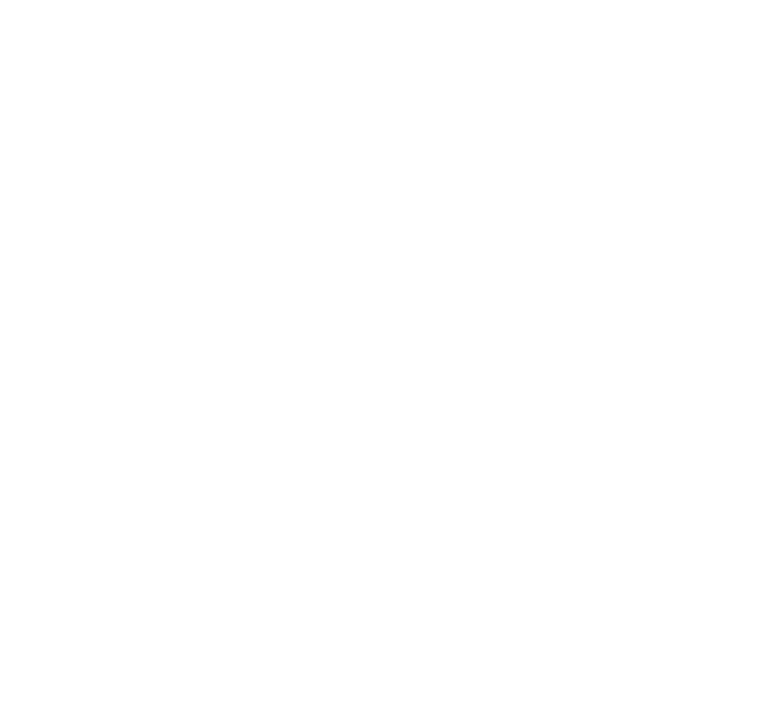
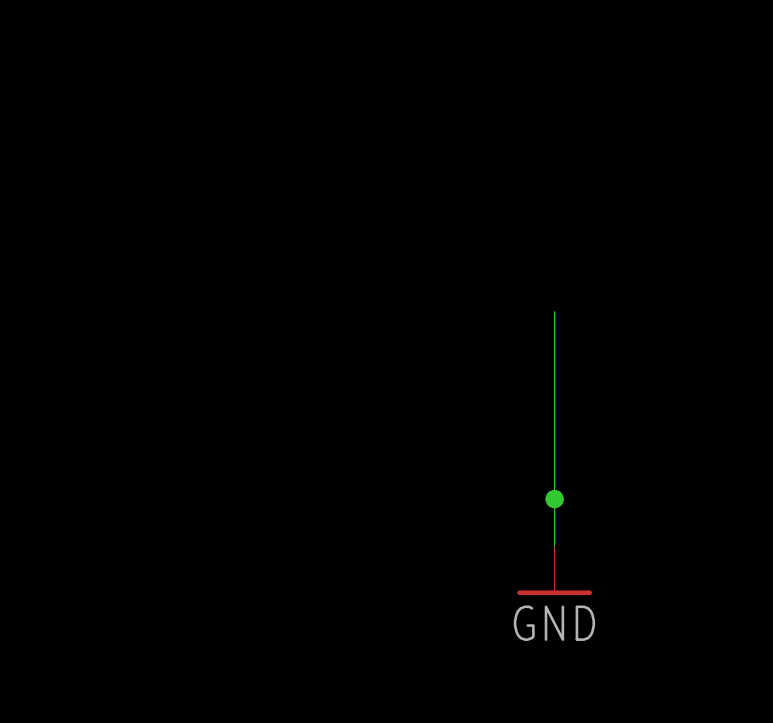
wire: none -> (554, 311) (554, 545)
junction: none -> (554, 499)
power symbol: none -> GND (554, 570)

